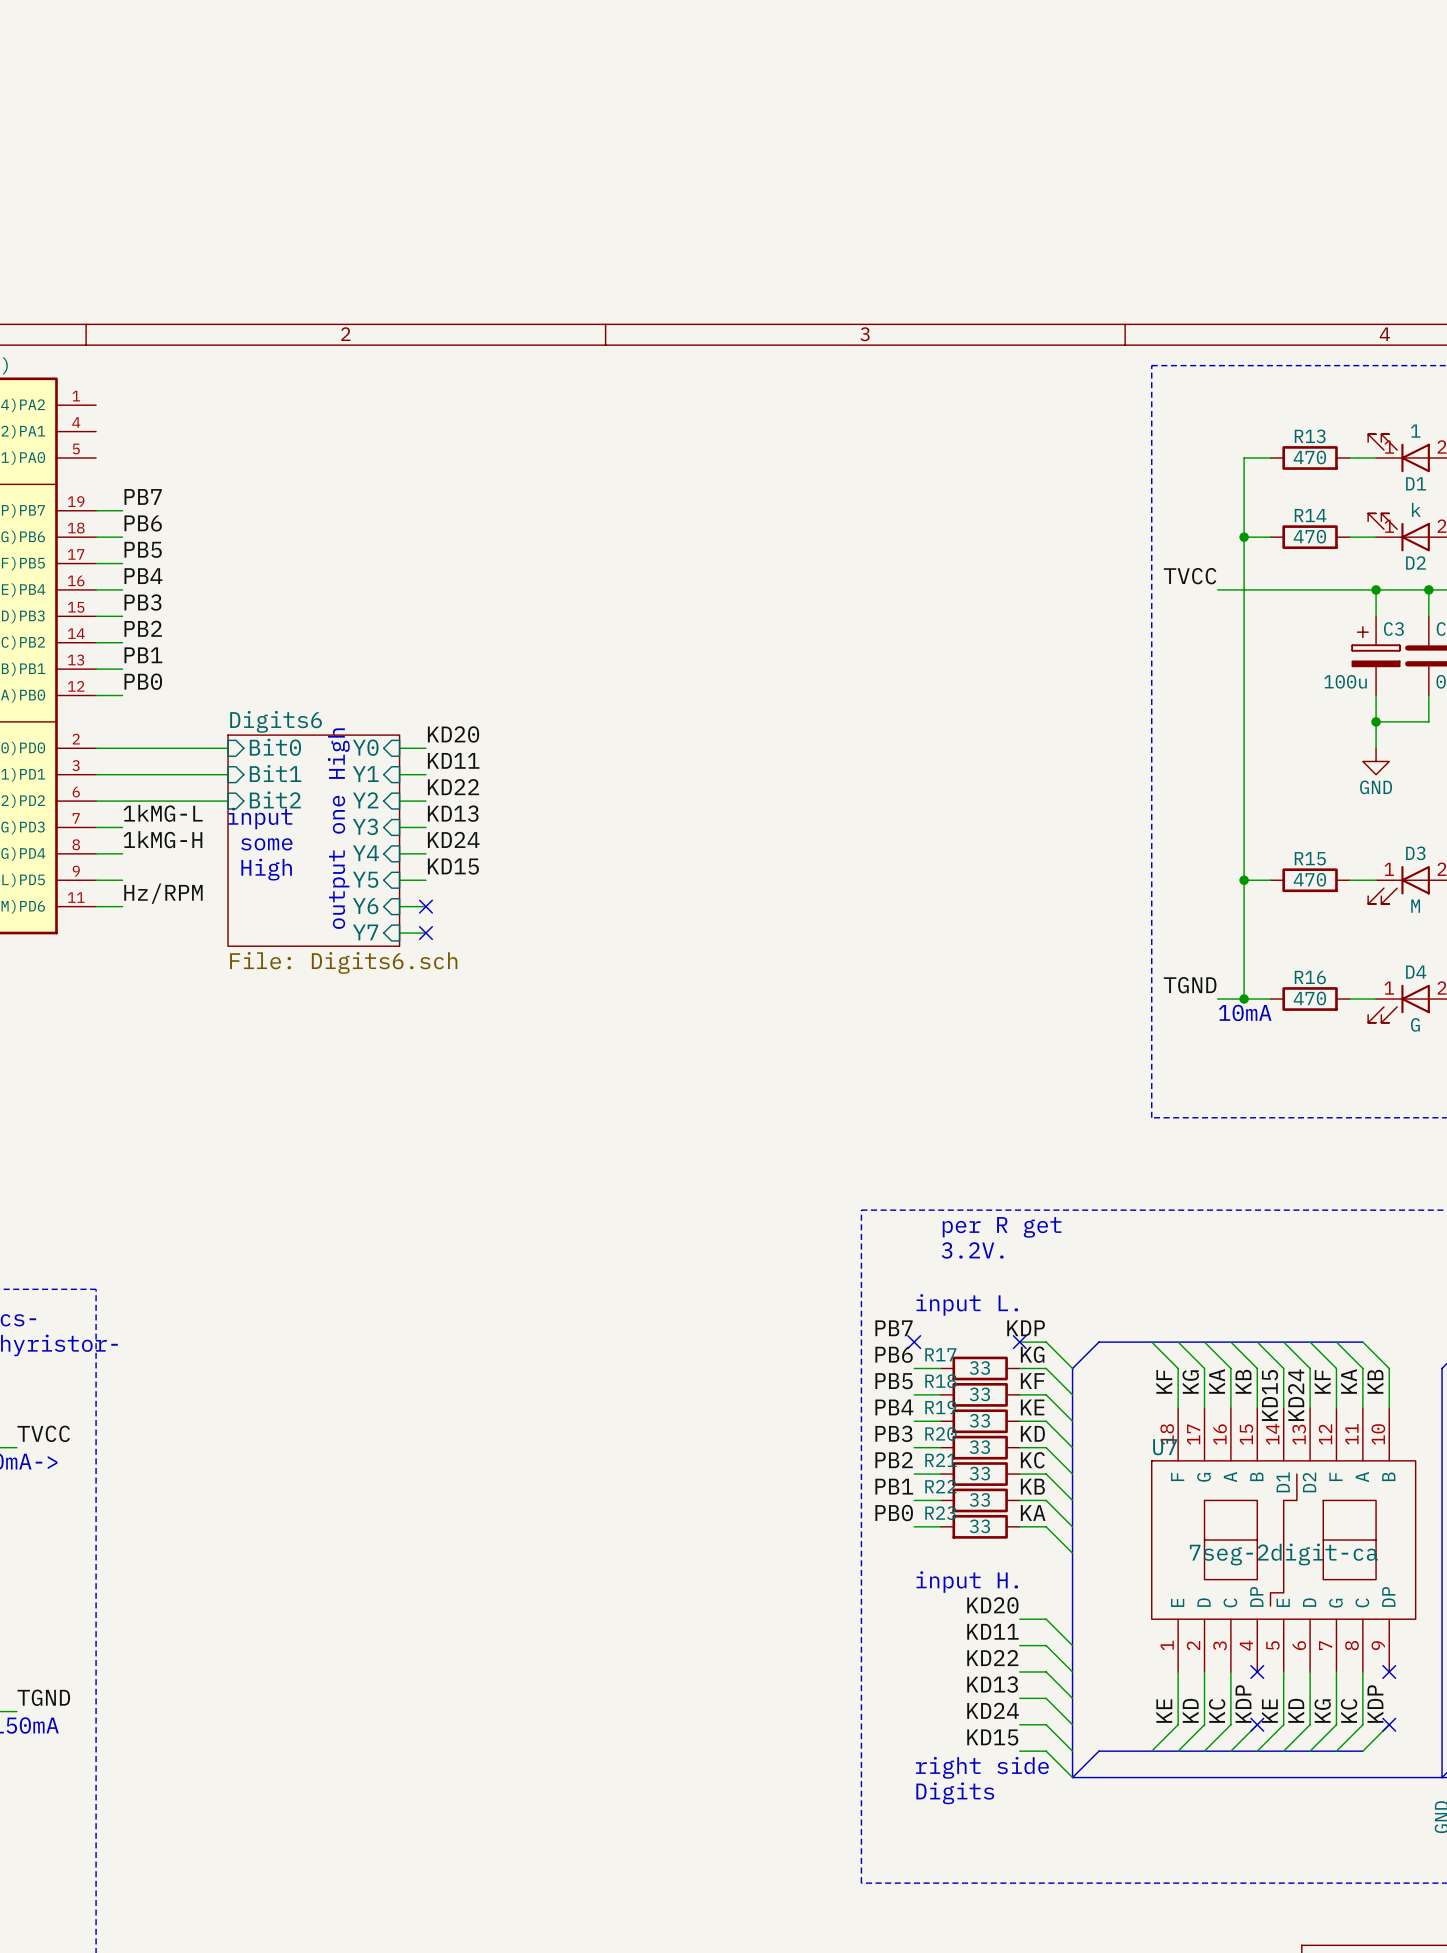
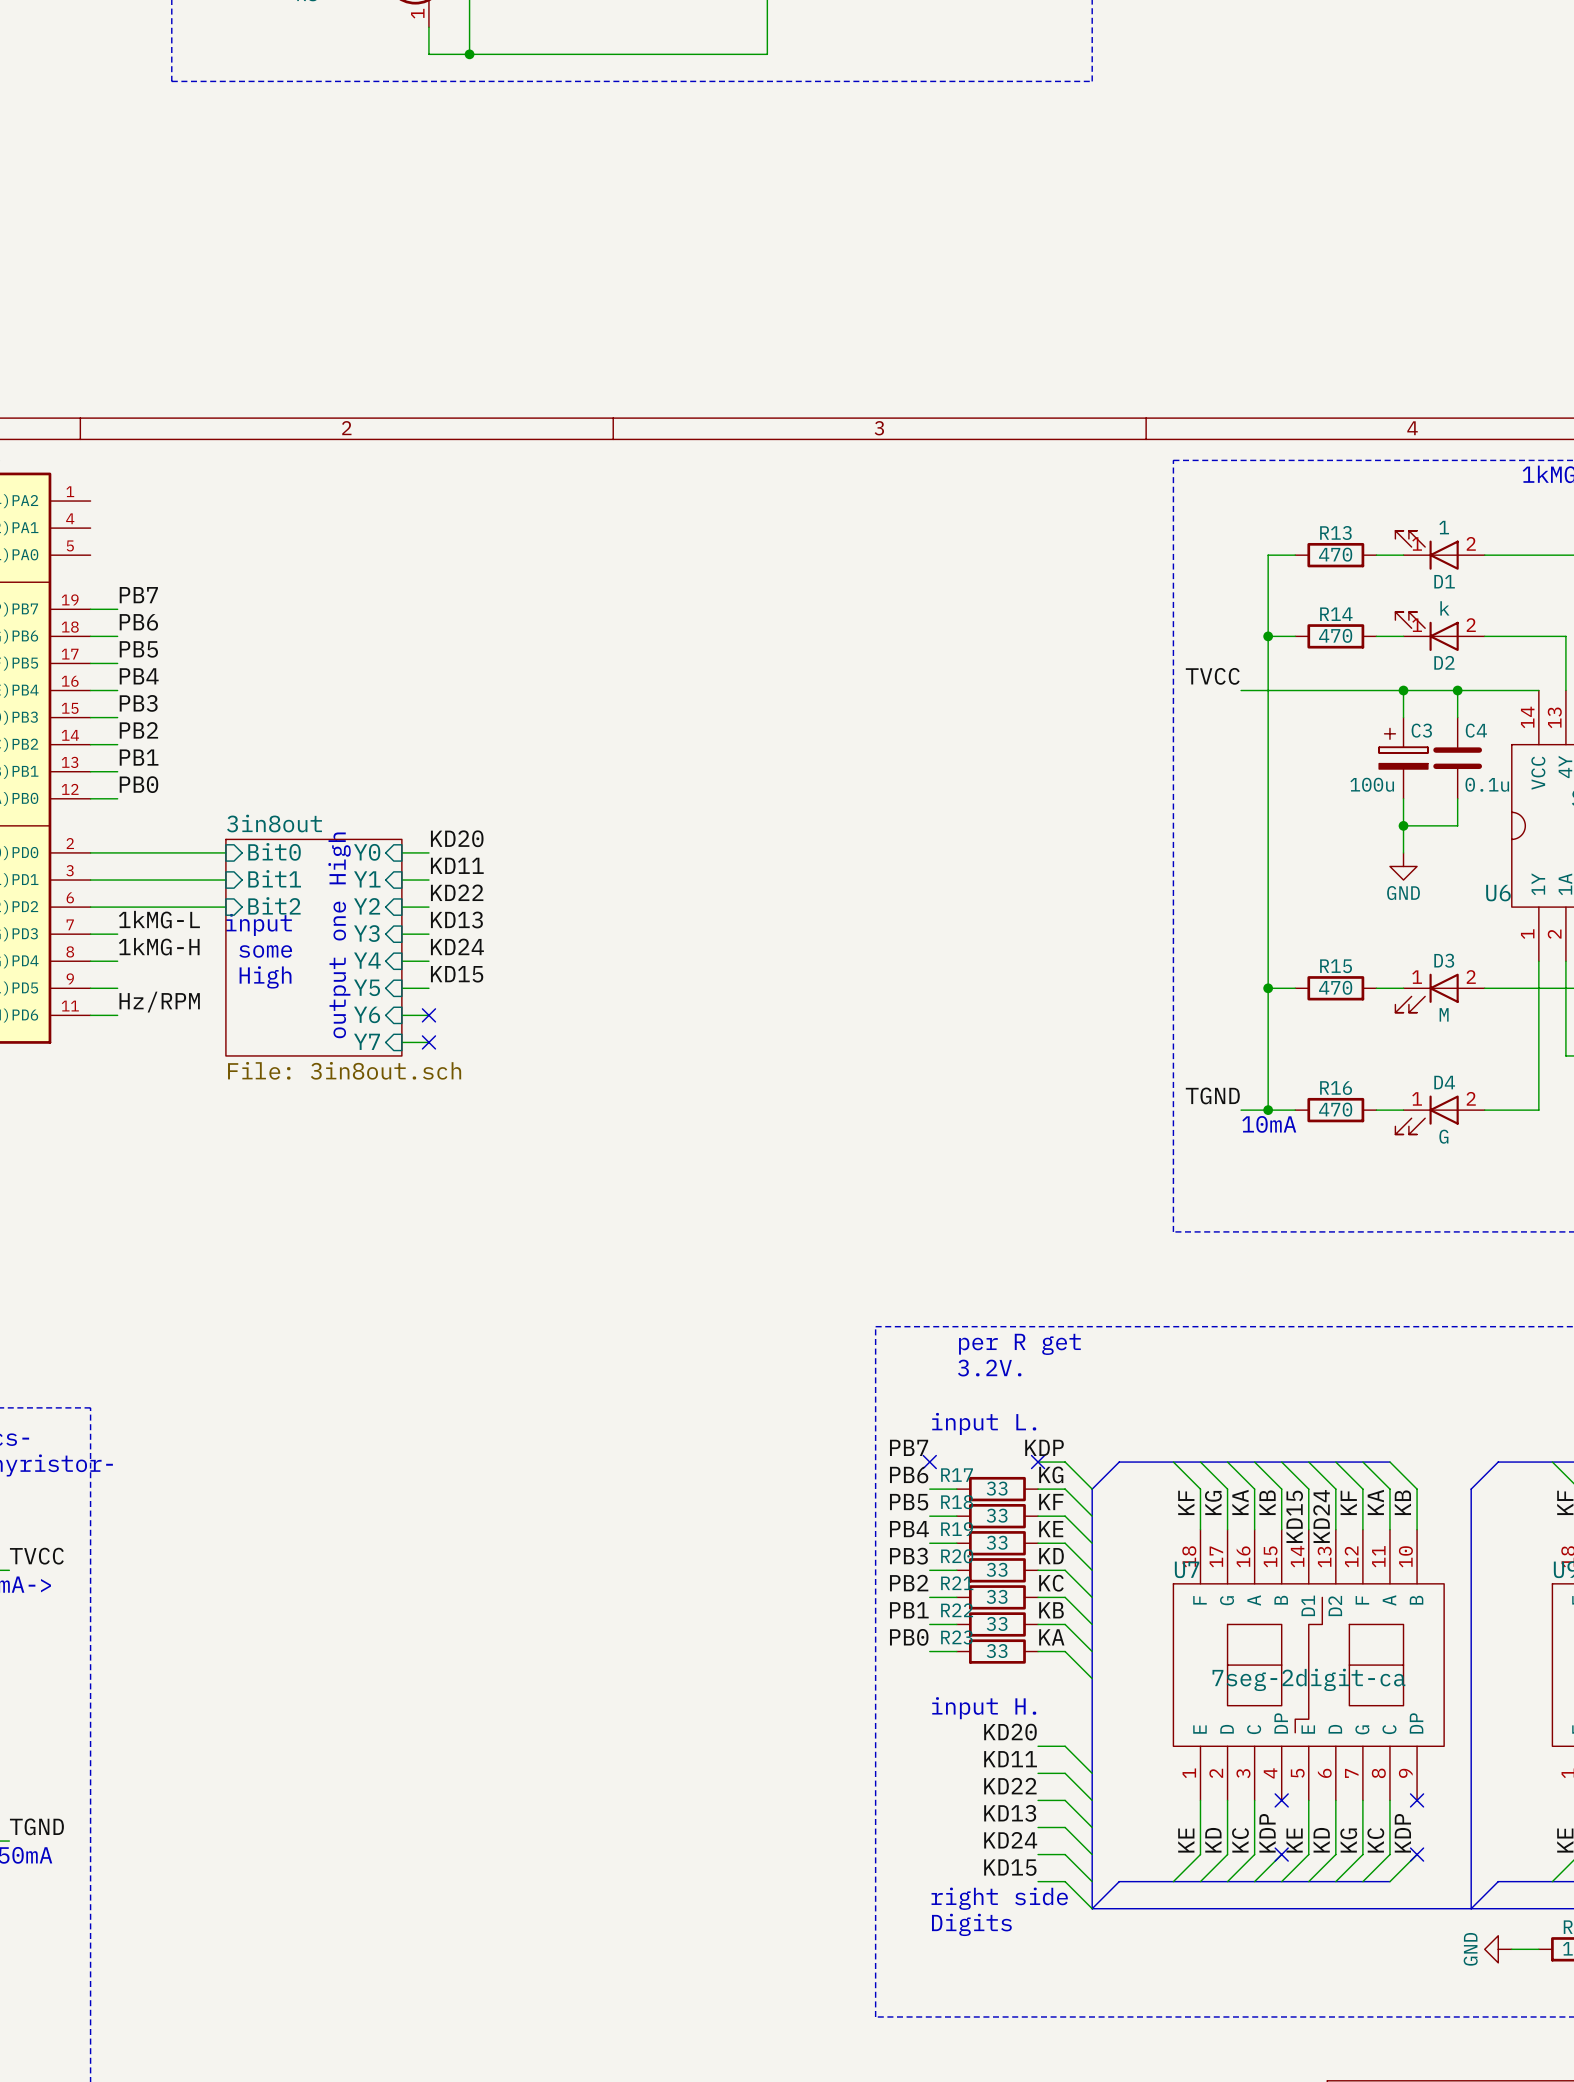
sheet Digits6 name: Digits6 (276, 721) -> 3in8out (274, 823)
sheet Digits6 value: File: Digits6.sch (343, 962) -> File: 3in8out.sch (344, 1070)

